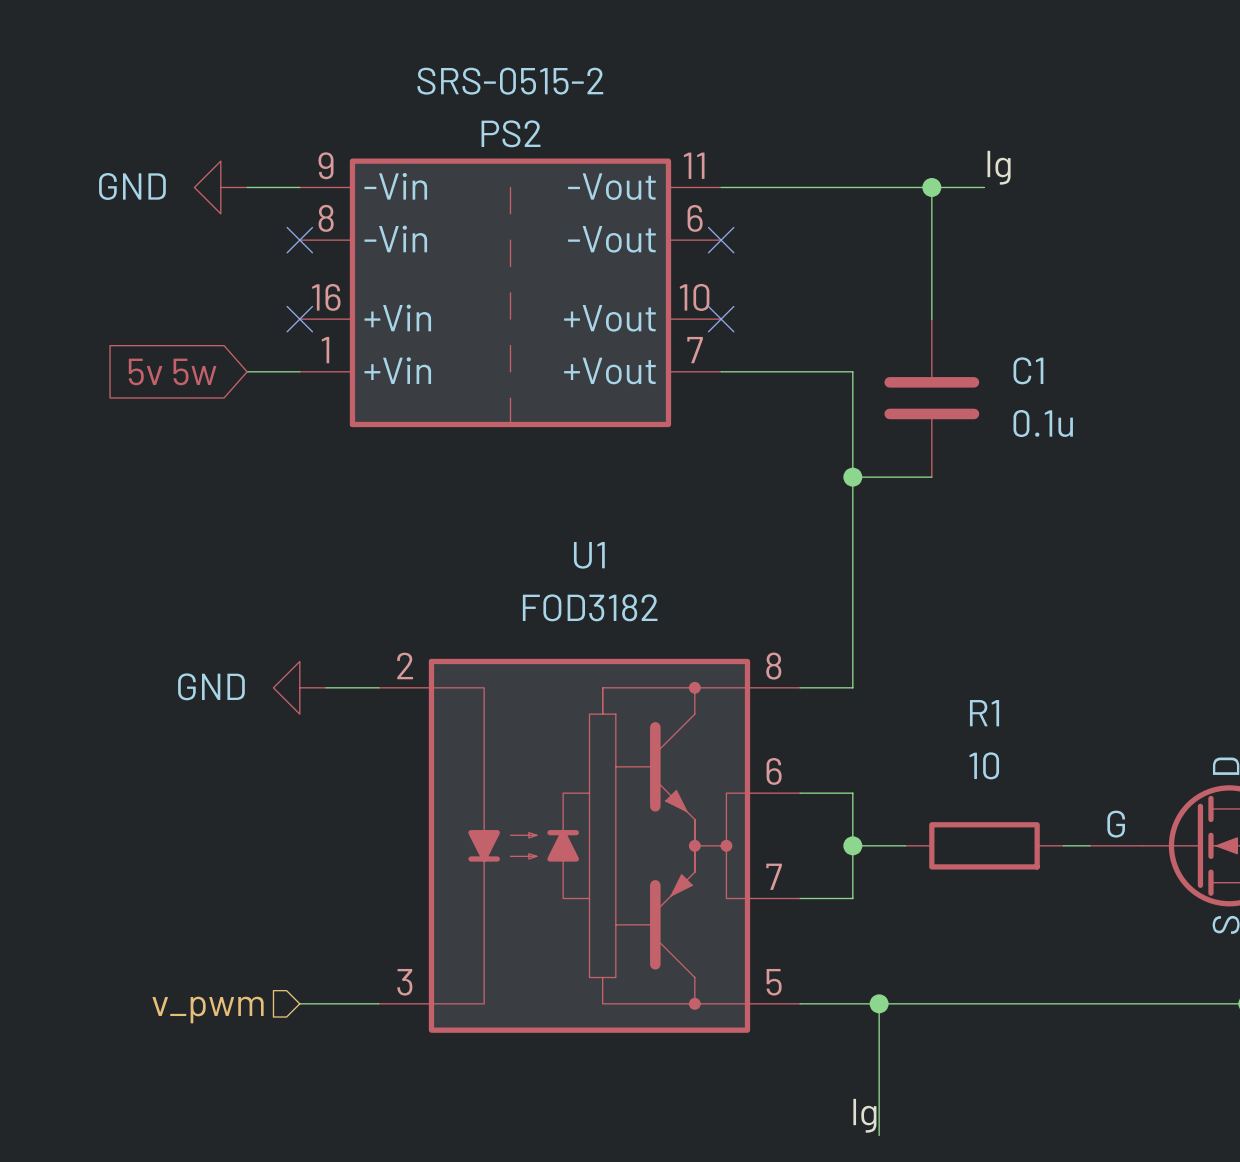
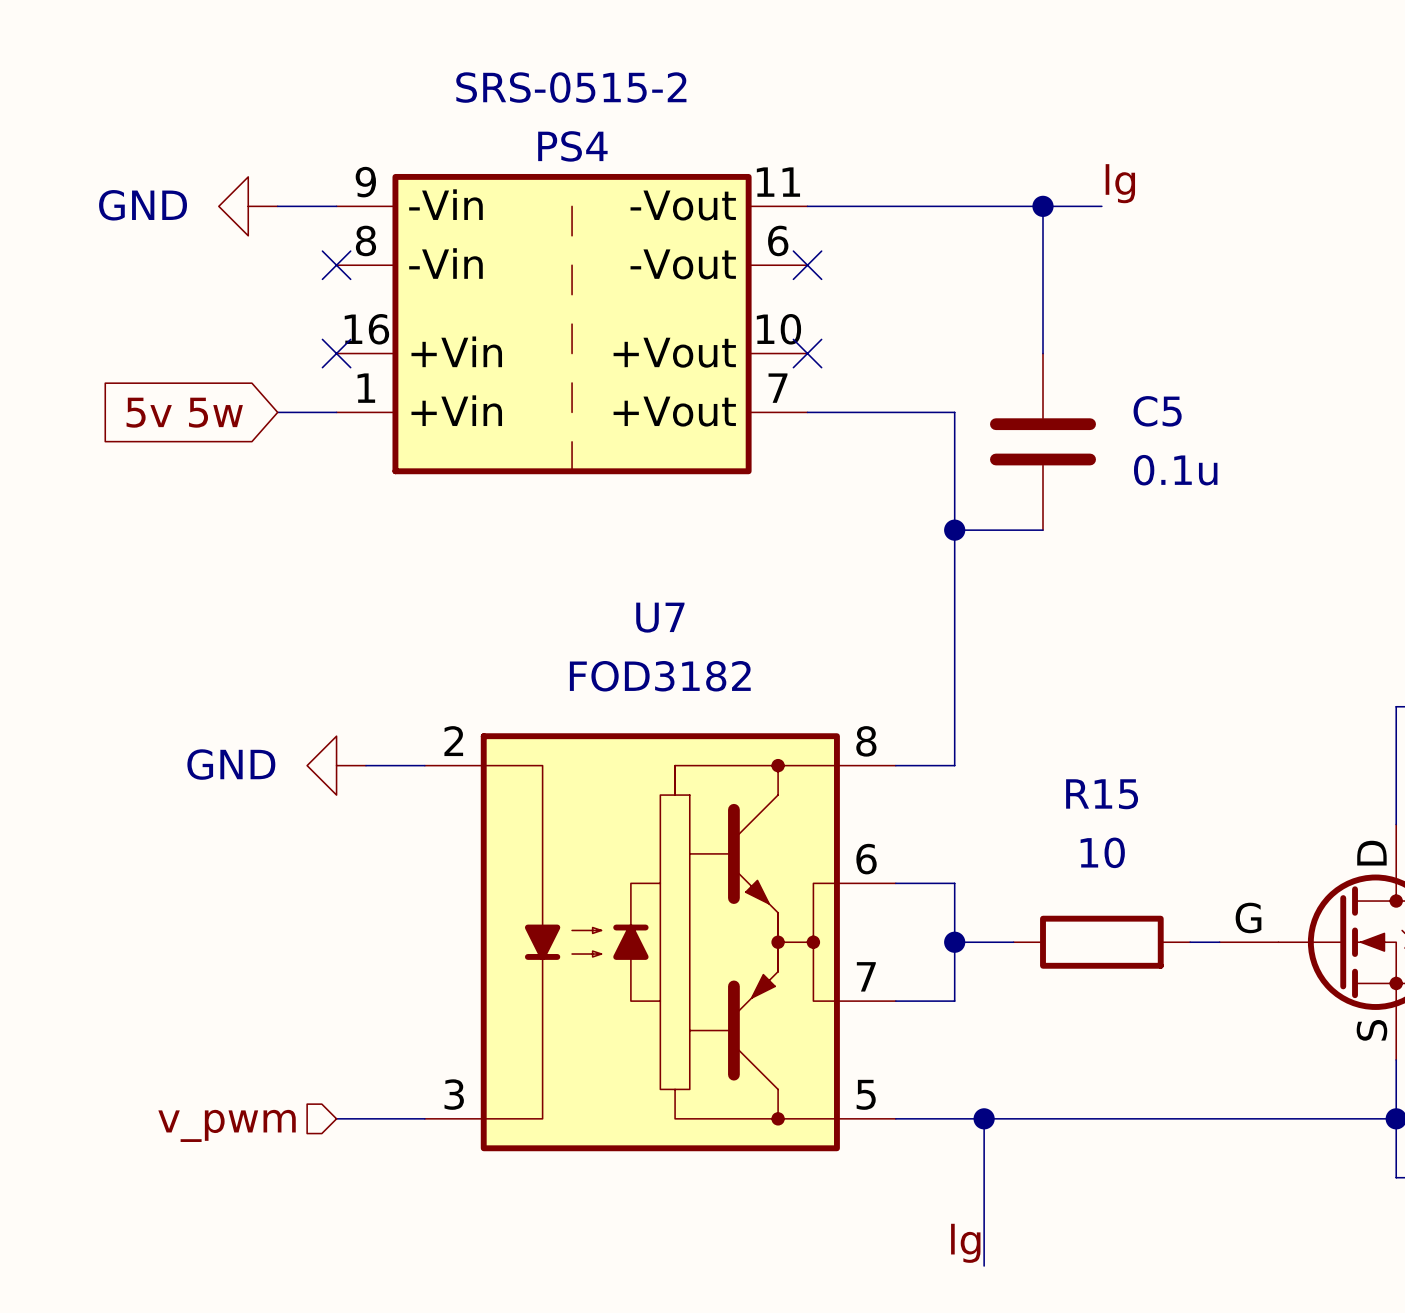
PS2 name: PS2 (511, 133) -> PS4 (572, 146)
C1 name: C1 (1028, 370) -> C5 (1157, 411)
U1 name: U1 (589, 555) -> U7 (660, 617)
R1 name: R1 (984, 713) -> R15 (1102, 794)

